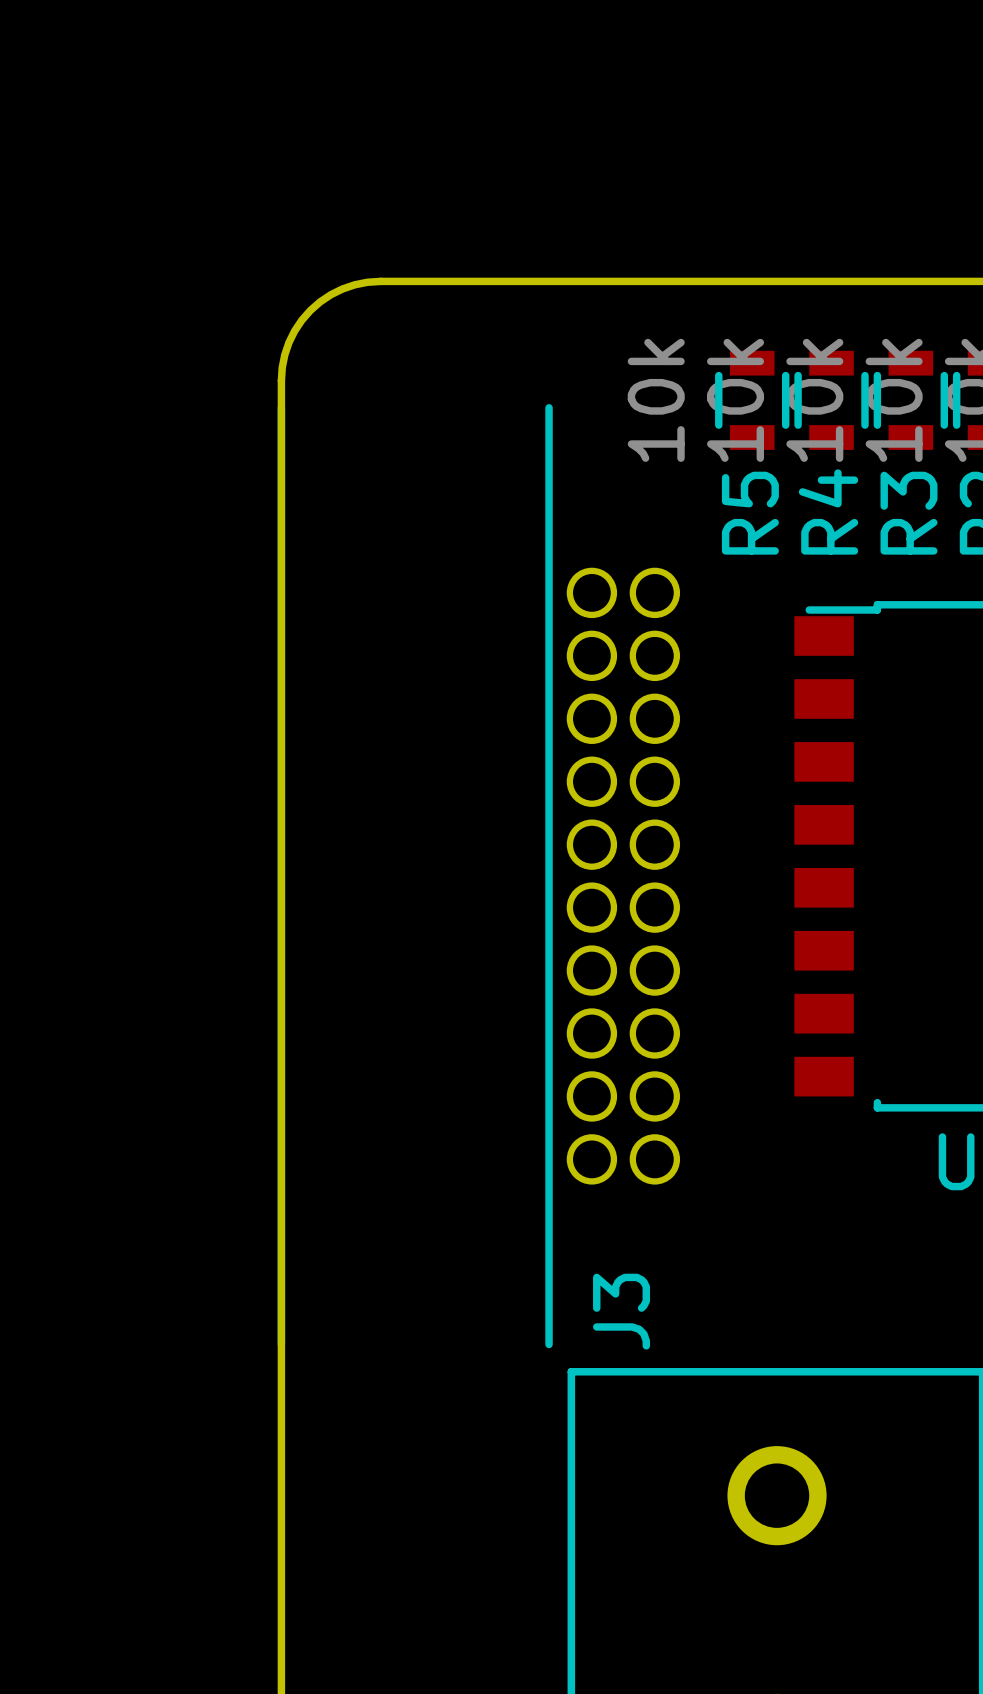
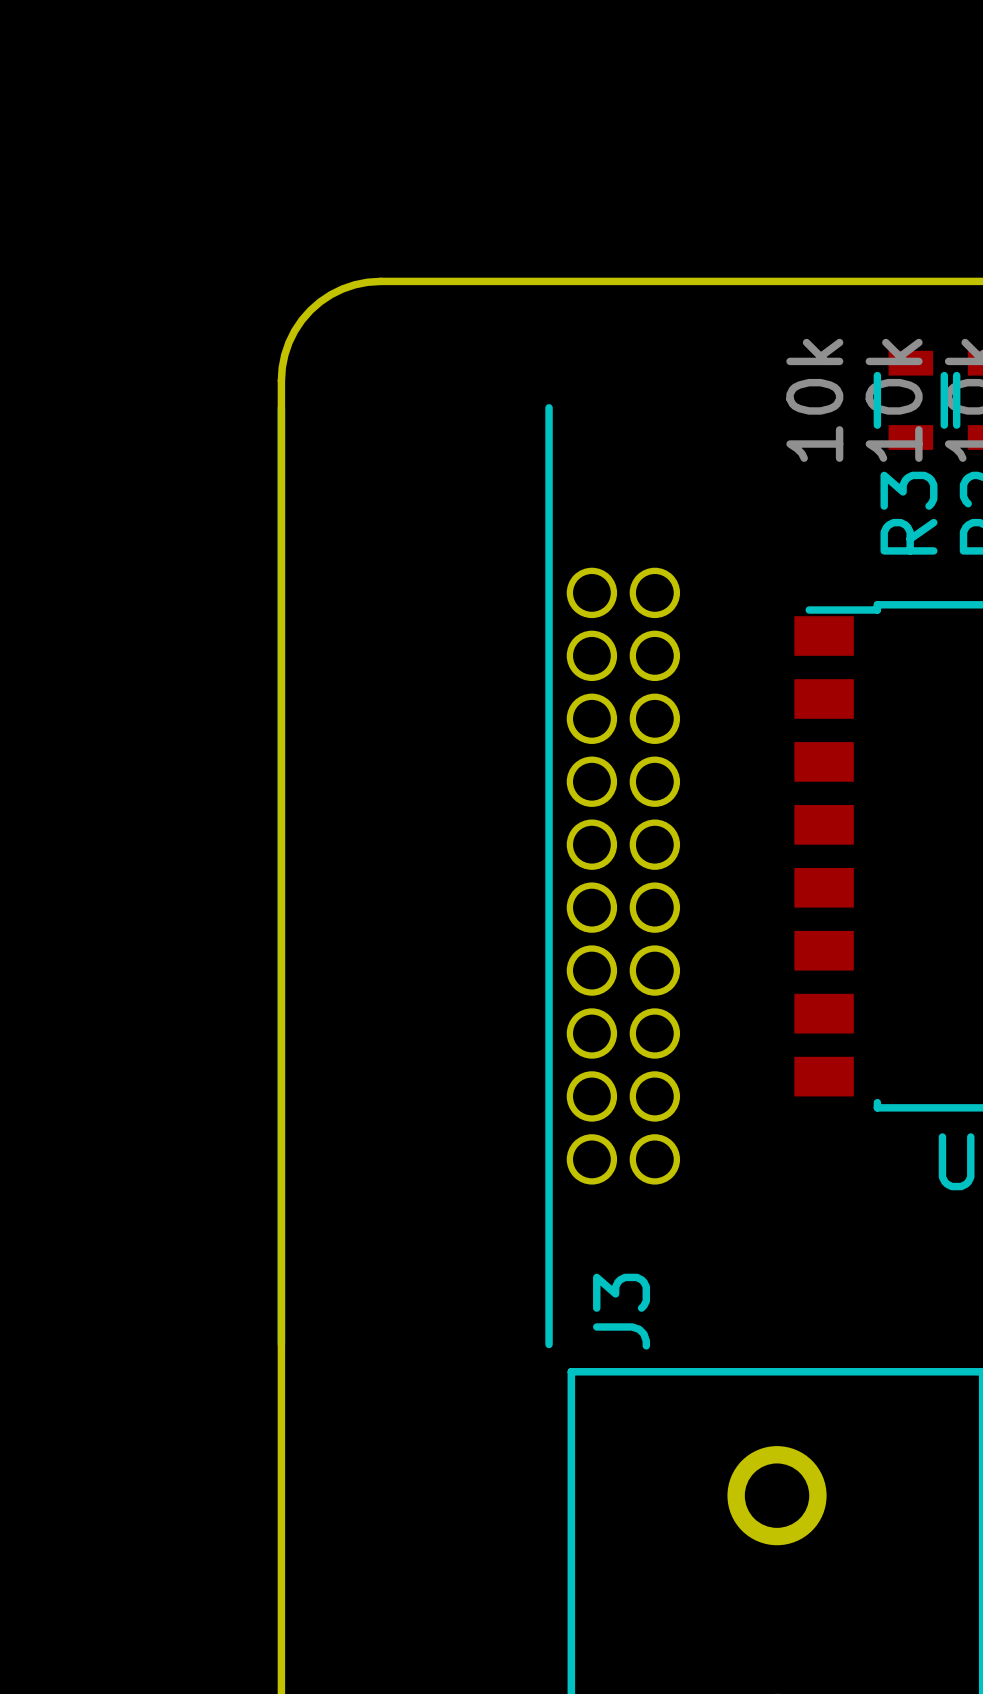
R5: 10k (752, 400) -> none
R4: 10k (831, 400) -> none

